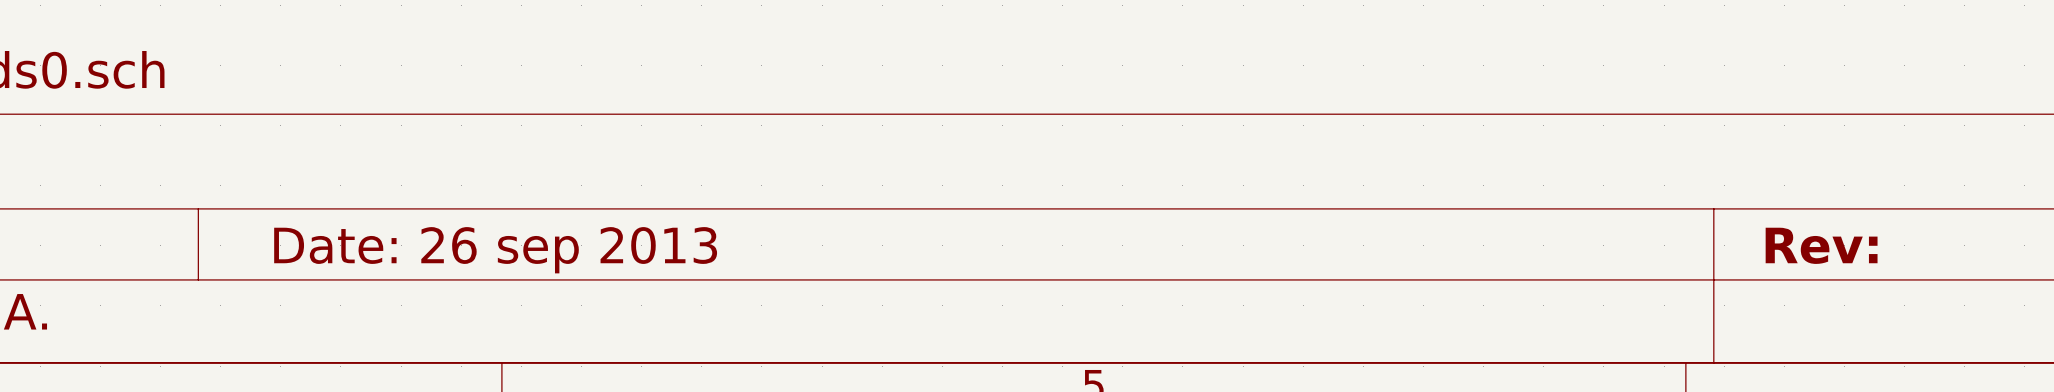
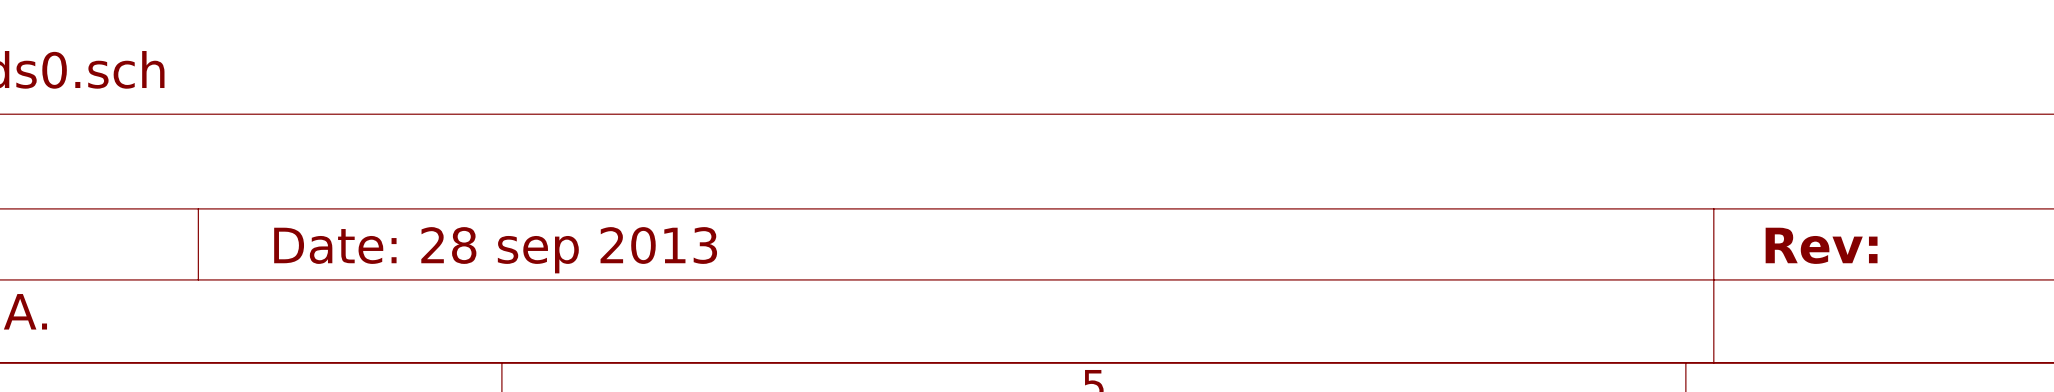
title block: Date: 26 sep 2013 (495, 250) -> Date: 28 sep 2013 (495, 250)

